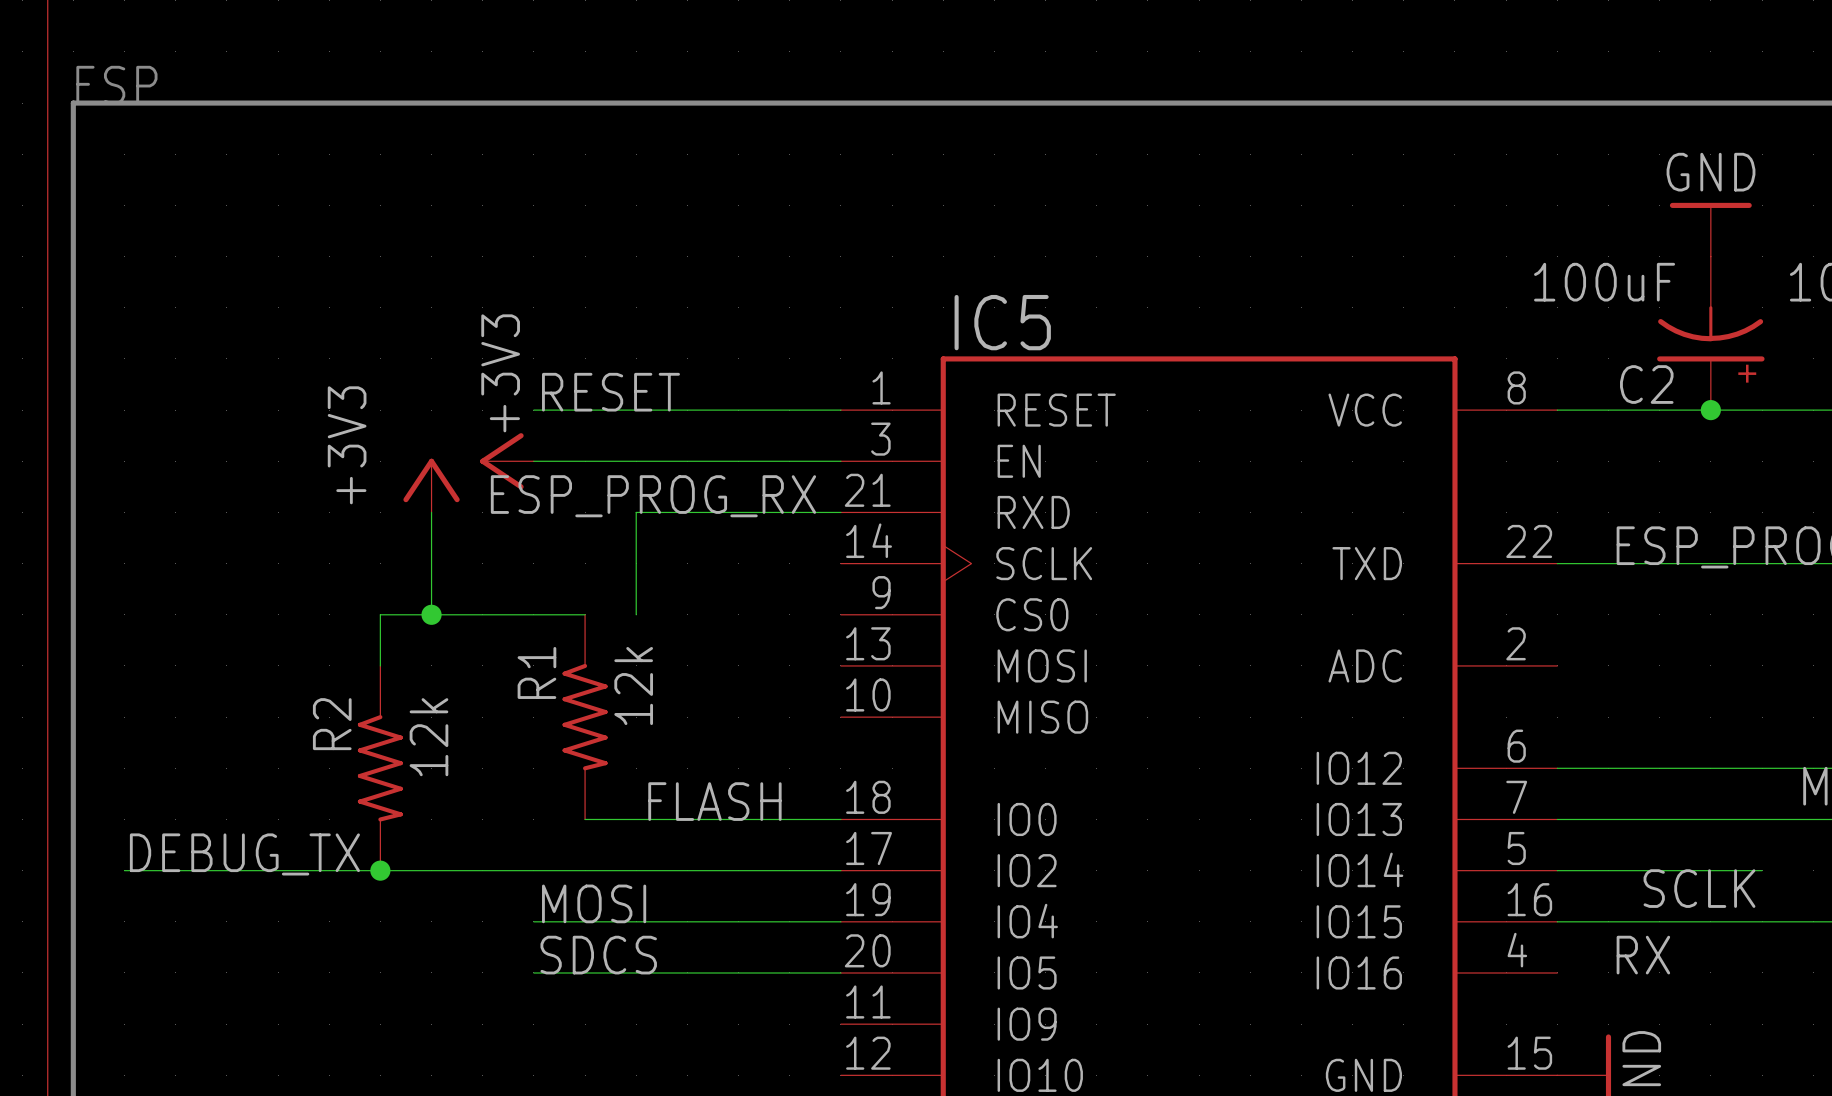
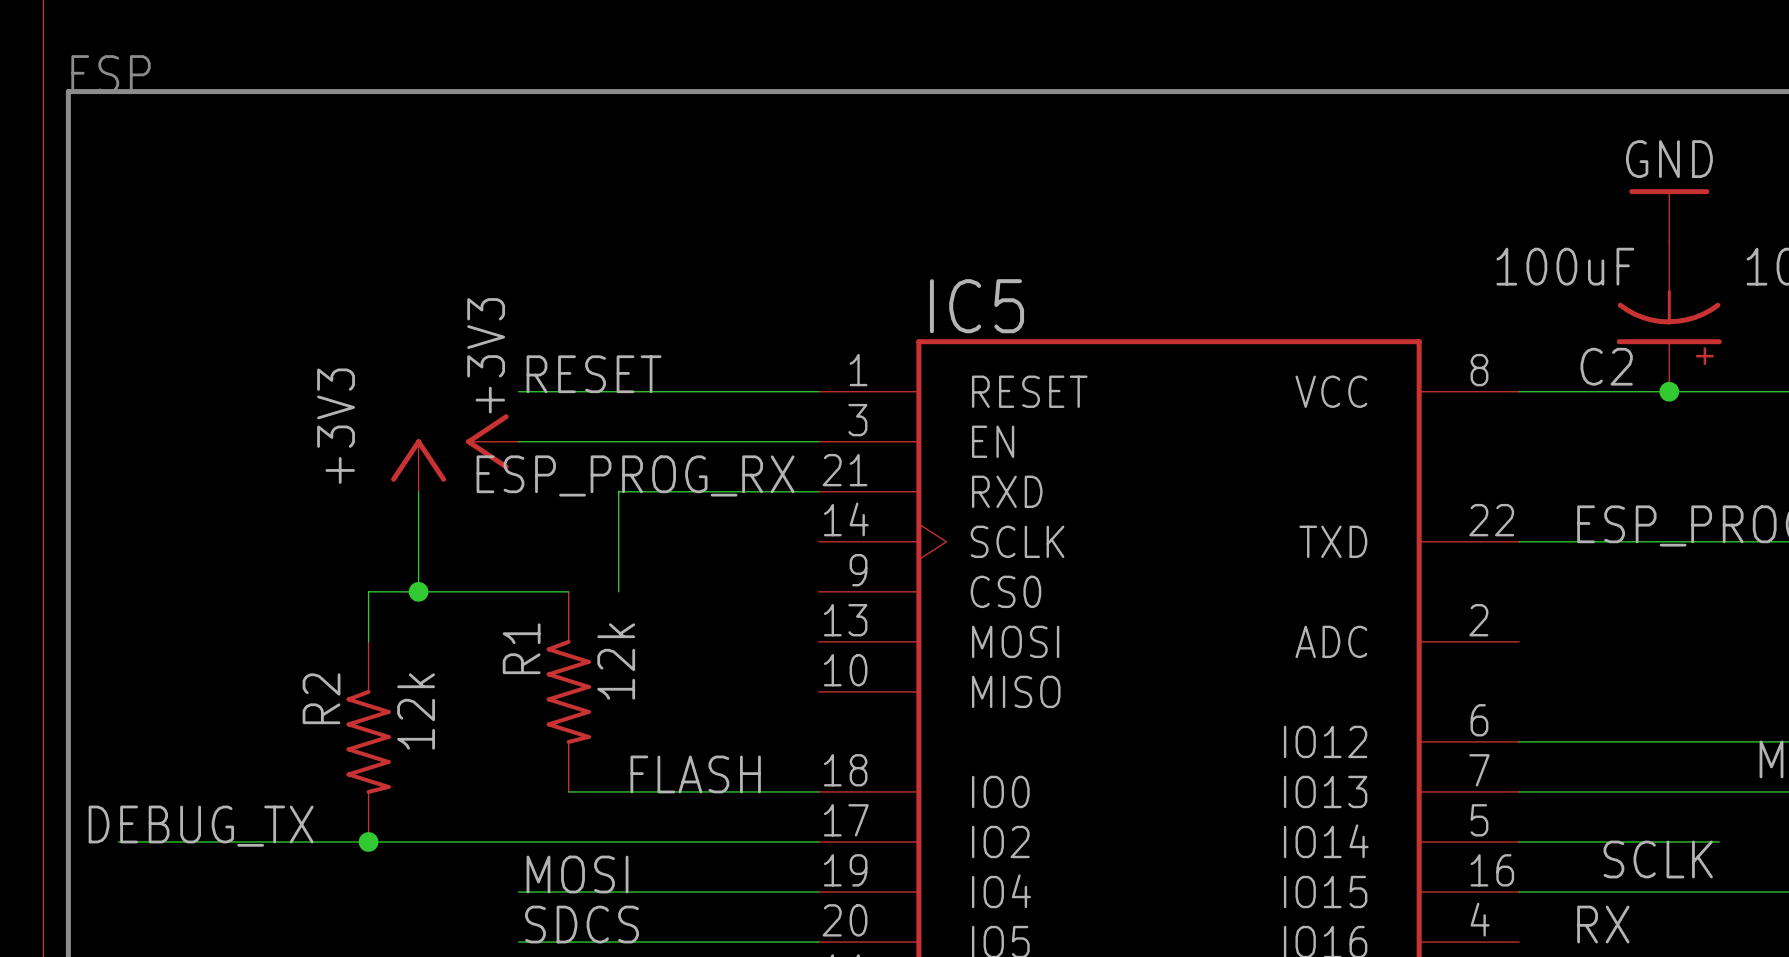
label position: DEBUG_TX (244, 854) -> DEBUG_TX (201, 826)

